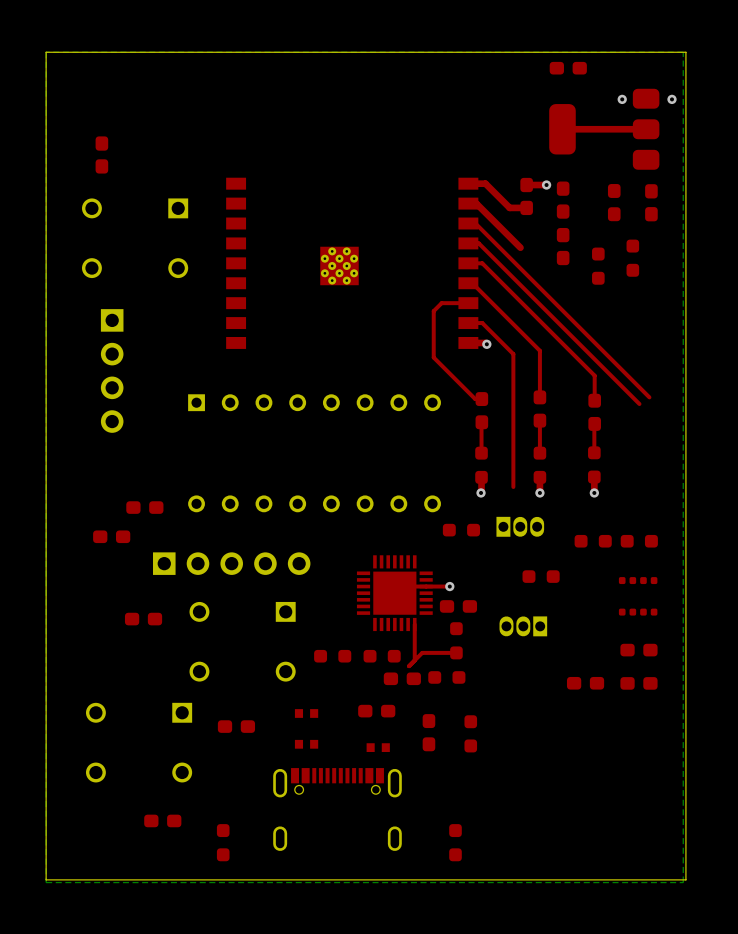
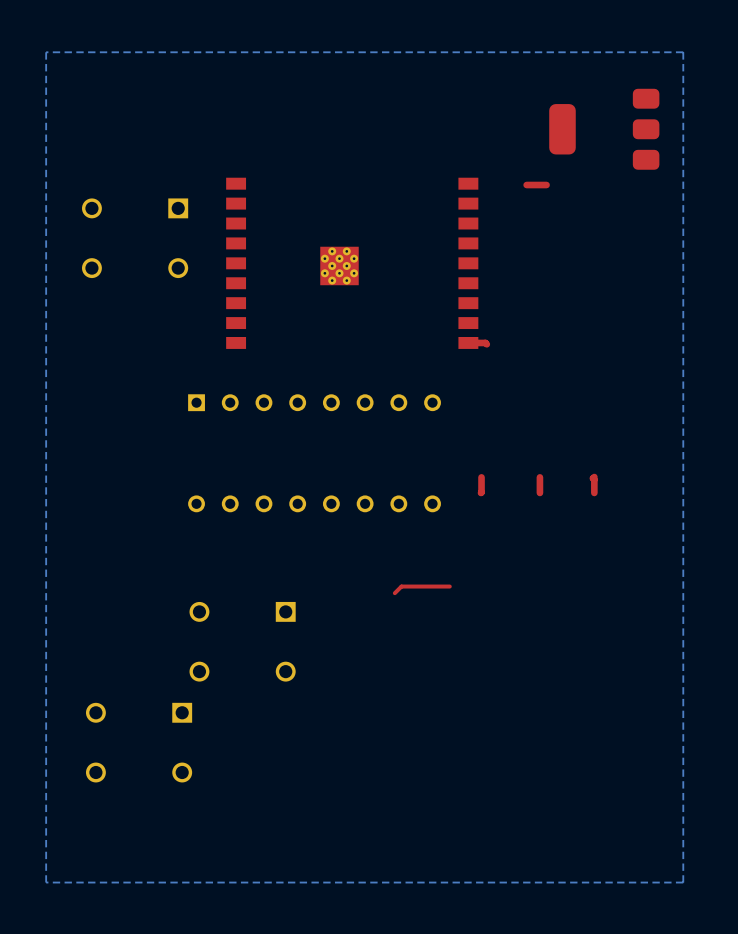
board edge: (685, 52) (46, 52) (46, 879) (685, 879) (685, 52) -> none
part: (568, 68) -> none
via: (622, 99) -> none
via: (672, 99) -> none
top track: (646, 129) (562, 129) -> none
part: (101, 154) -> none
top track: (468, 183) (485, 183) (509, 207) (526, 207) -> none
via: (546, 185) -> none
part: (526, 196) -> none
part: (563, 200) -> none
part: (614, 202) -> none
part: (651, 202) -> none
top track: (468, 203) (476, 203) (520, 247) -> none
top track: (468, 223) (475, 223) (649, 397) -> none
top track: (468, 243) (478, 243) (639, 404) -> none
part: (563, 246) -> none
part: (632, 258) -> none
top track: (468, 263) (482, 263) (594, 375) (594, 400) -> none
part: (598, 266) -> none
top track: (468, 283) (472, 283) (539, 350) (539, 397) -> none
top track: (468, 303) (441, 303) (433, 311) (433, 357) (475, 399) (481, 399) -> none
top track: (468, 323) (482, 323) (513, 354) (513, 486) -> none
via: (486, 344) -> none
part: (112, 370) -> none
part: (539, 409) -> none
part: (481, 410) -> none
part: (594, 412) -> none
top track: (539, 420) (539, 453) -> none
top track: (481, 422) (482, 453) -> none
top track: (594, 423) (594, 452) -> none
part: (594, 464) -> none
part: (481, 465) -> none
part: (539, 465) -> none
via: (481, 492) -> none
via: (539, 492) -> none
via: (594, 492) -> none
part: (144, 507) -> none
part: (520, 526) -> none
part: (461, 530) -> none
part: (111, 536) -> none
part: (593, 541) -> none
part: (639, 541) -> none
part: (231, 563) -> none
part: (541, 576) -> none
via: (449, 586) -> none
part: (394, 593) -> none
part: (638, 596) -> none
part: (458, 606) -> none
part: (143, 619) -> none
top track: (414, 624) (414, 660) -> none
part: (523, 626) -> none
part: (456, 640) -> none
part: (638, 650) -> none
top track: (456, 652) (422, 652) (408, 666) -> none
part: (332, 656) -> none
part: (382, 656) -> none
part: (446, 677) -> none
part: (402, 678) -> none
part: (585, 683) -> none
part: (638, 683) -> none
part: (376, 711) -> none
part: (306, 713) -> none
part: (236, 726) -> none
part: (428, 732) -> none
part: (470, 733) -> none
part: (306, 744) -> none
part: (378, 747) -> none
part: (337, 809) -> none
part: (162, 820) -> none
part: (223, 842) -> none
part: (455, 842) -> none

